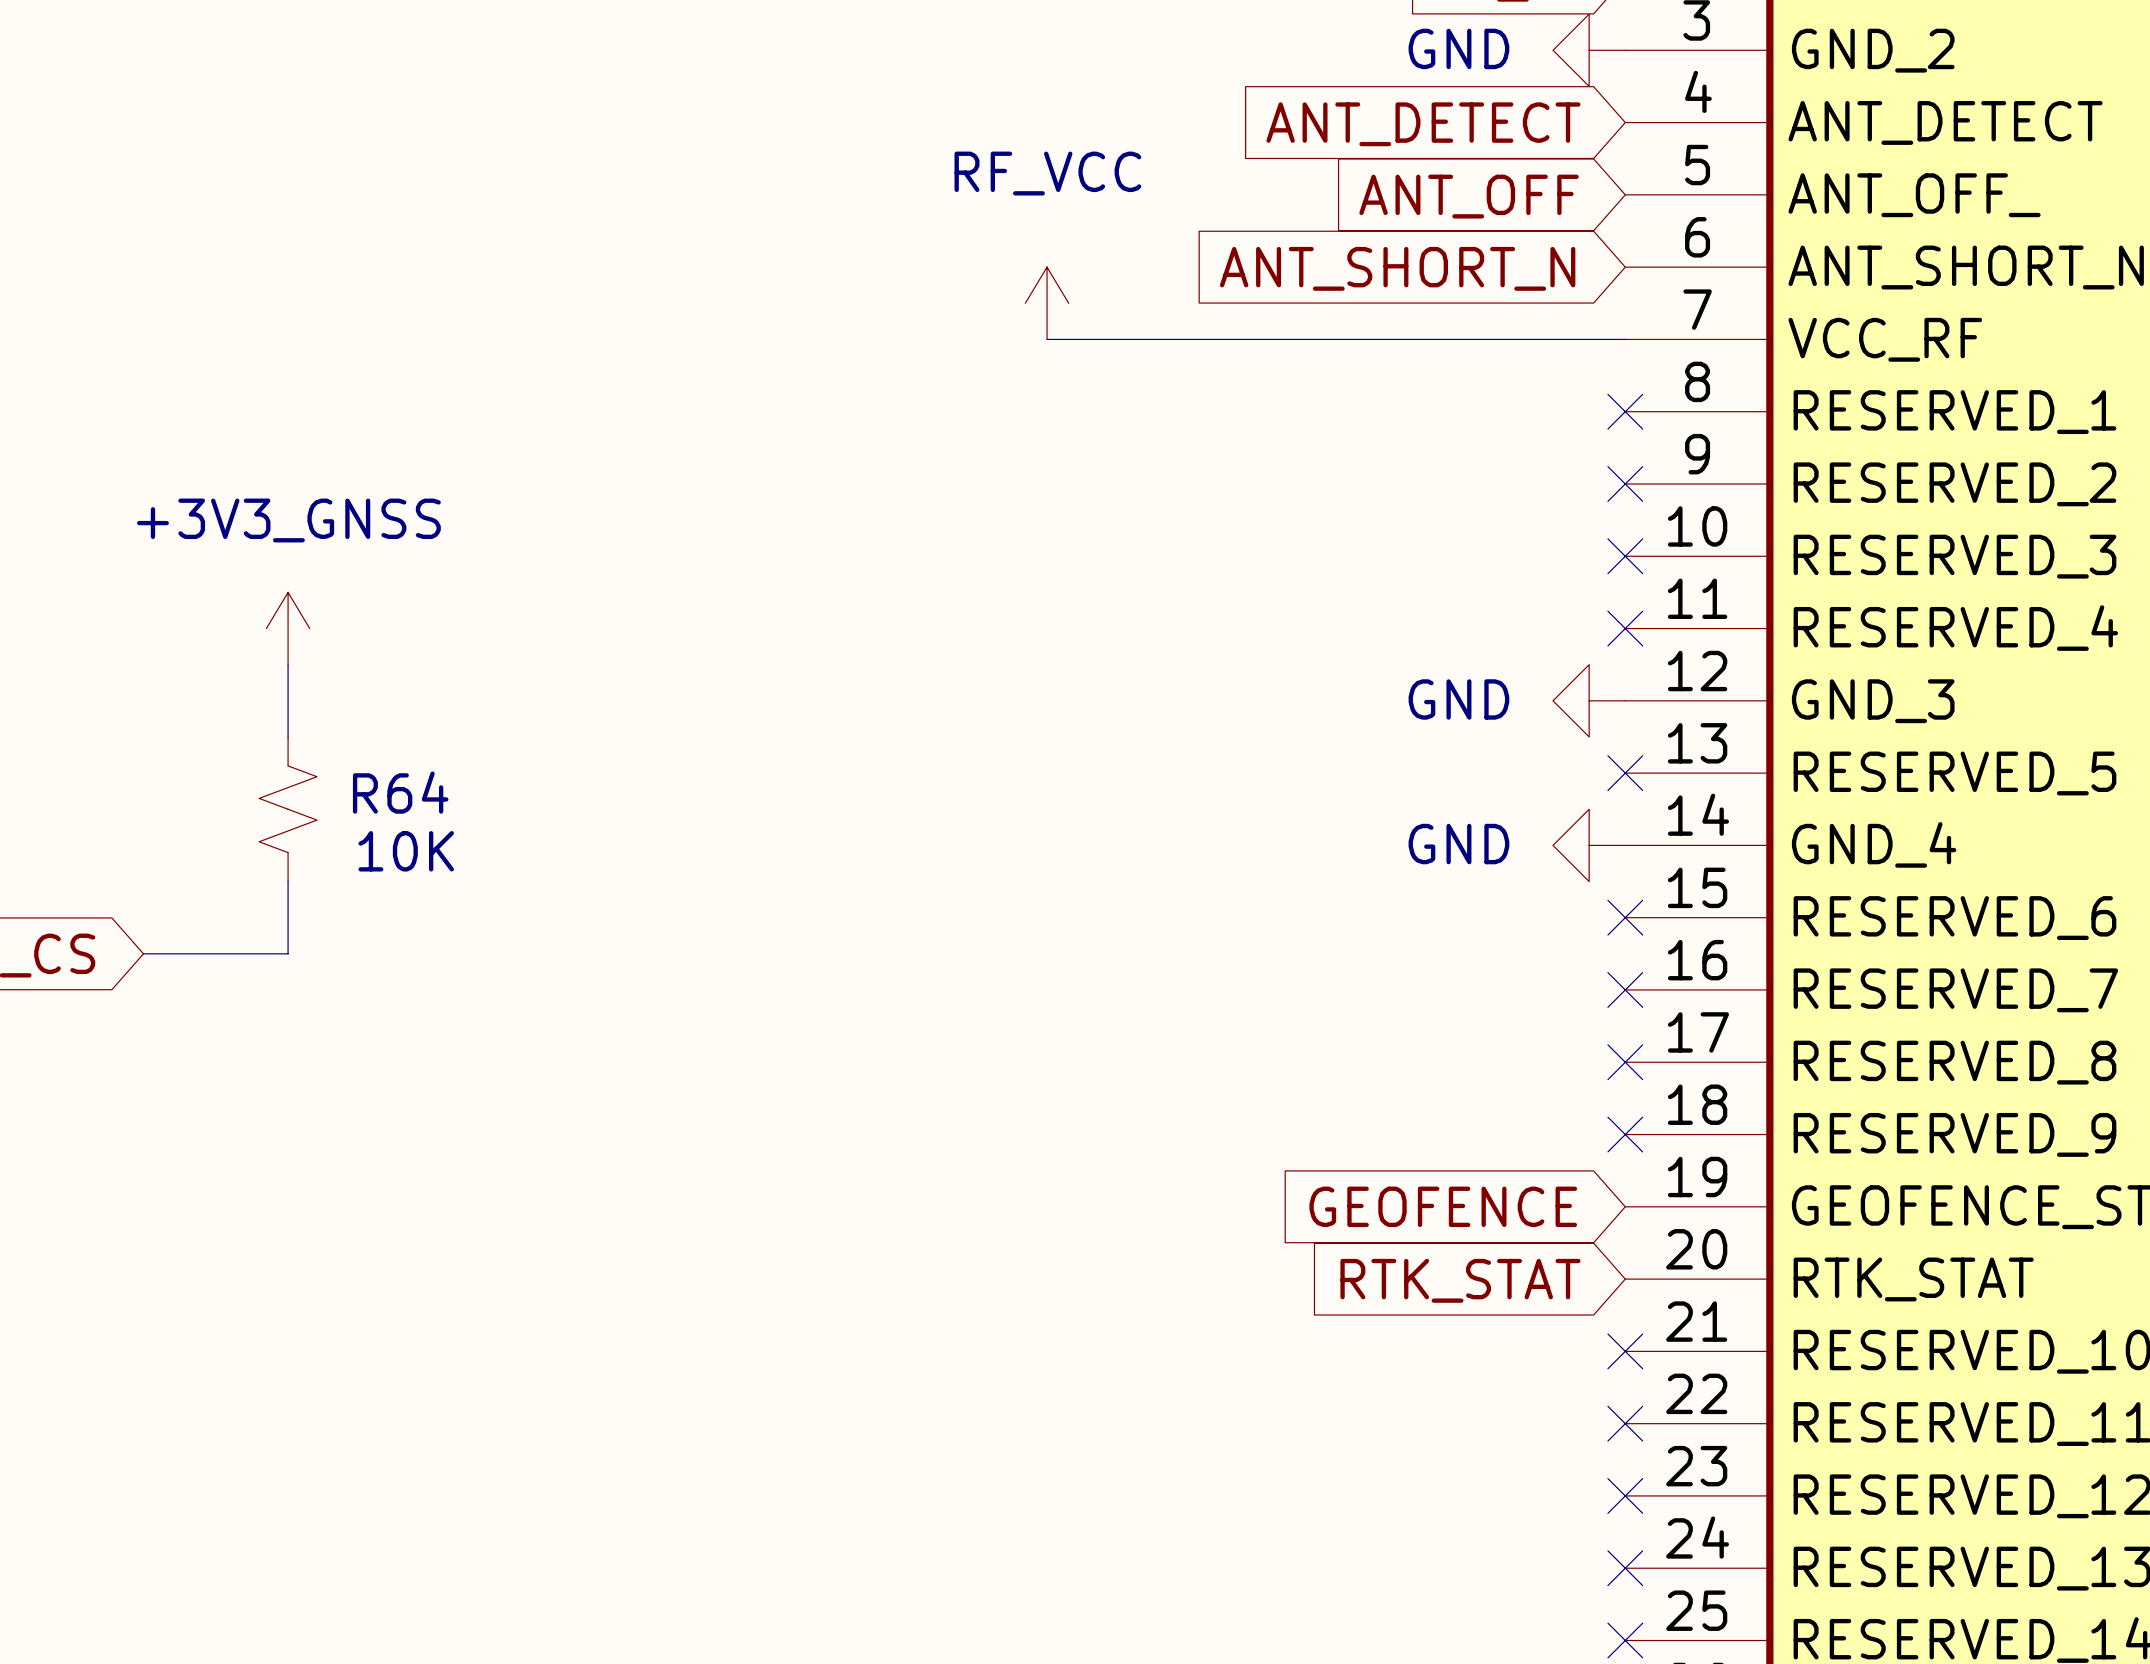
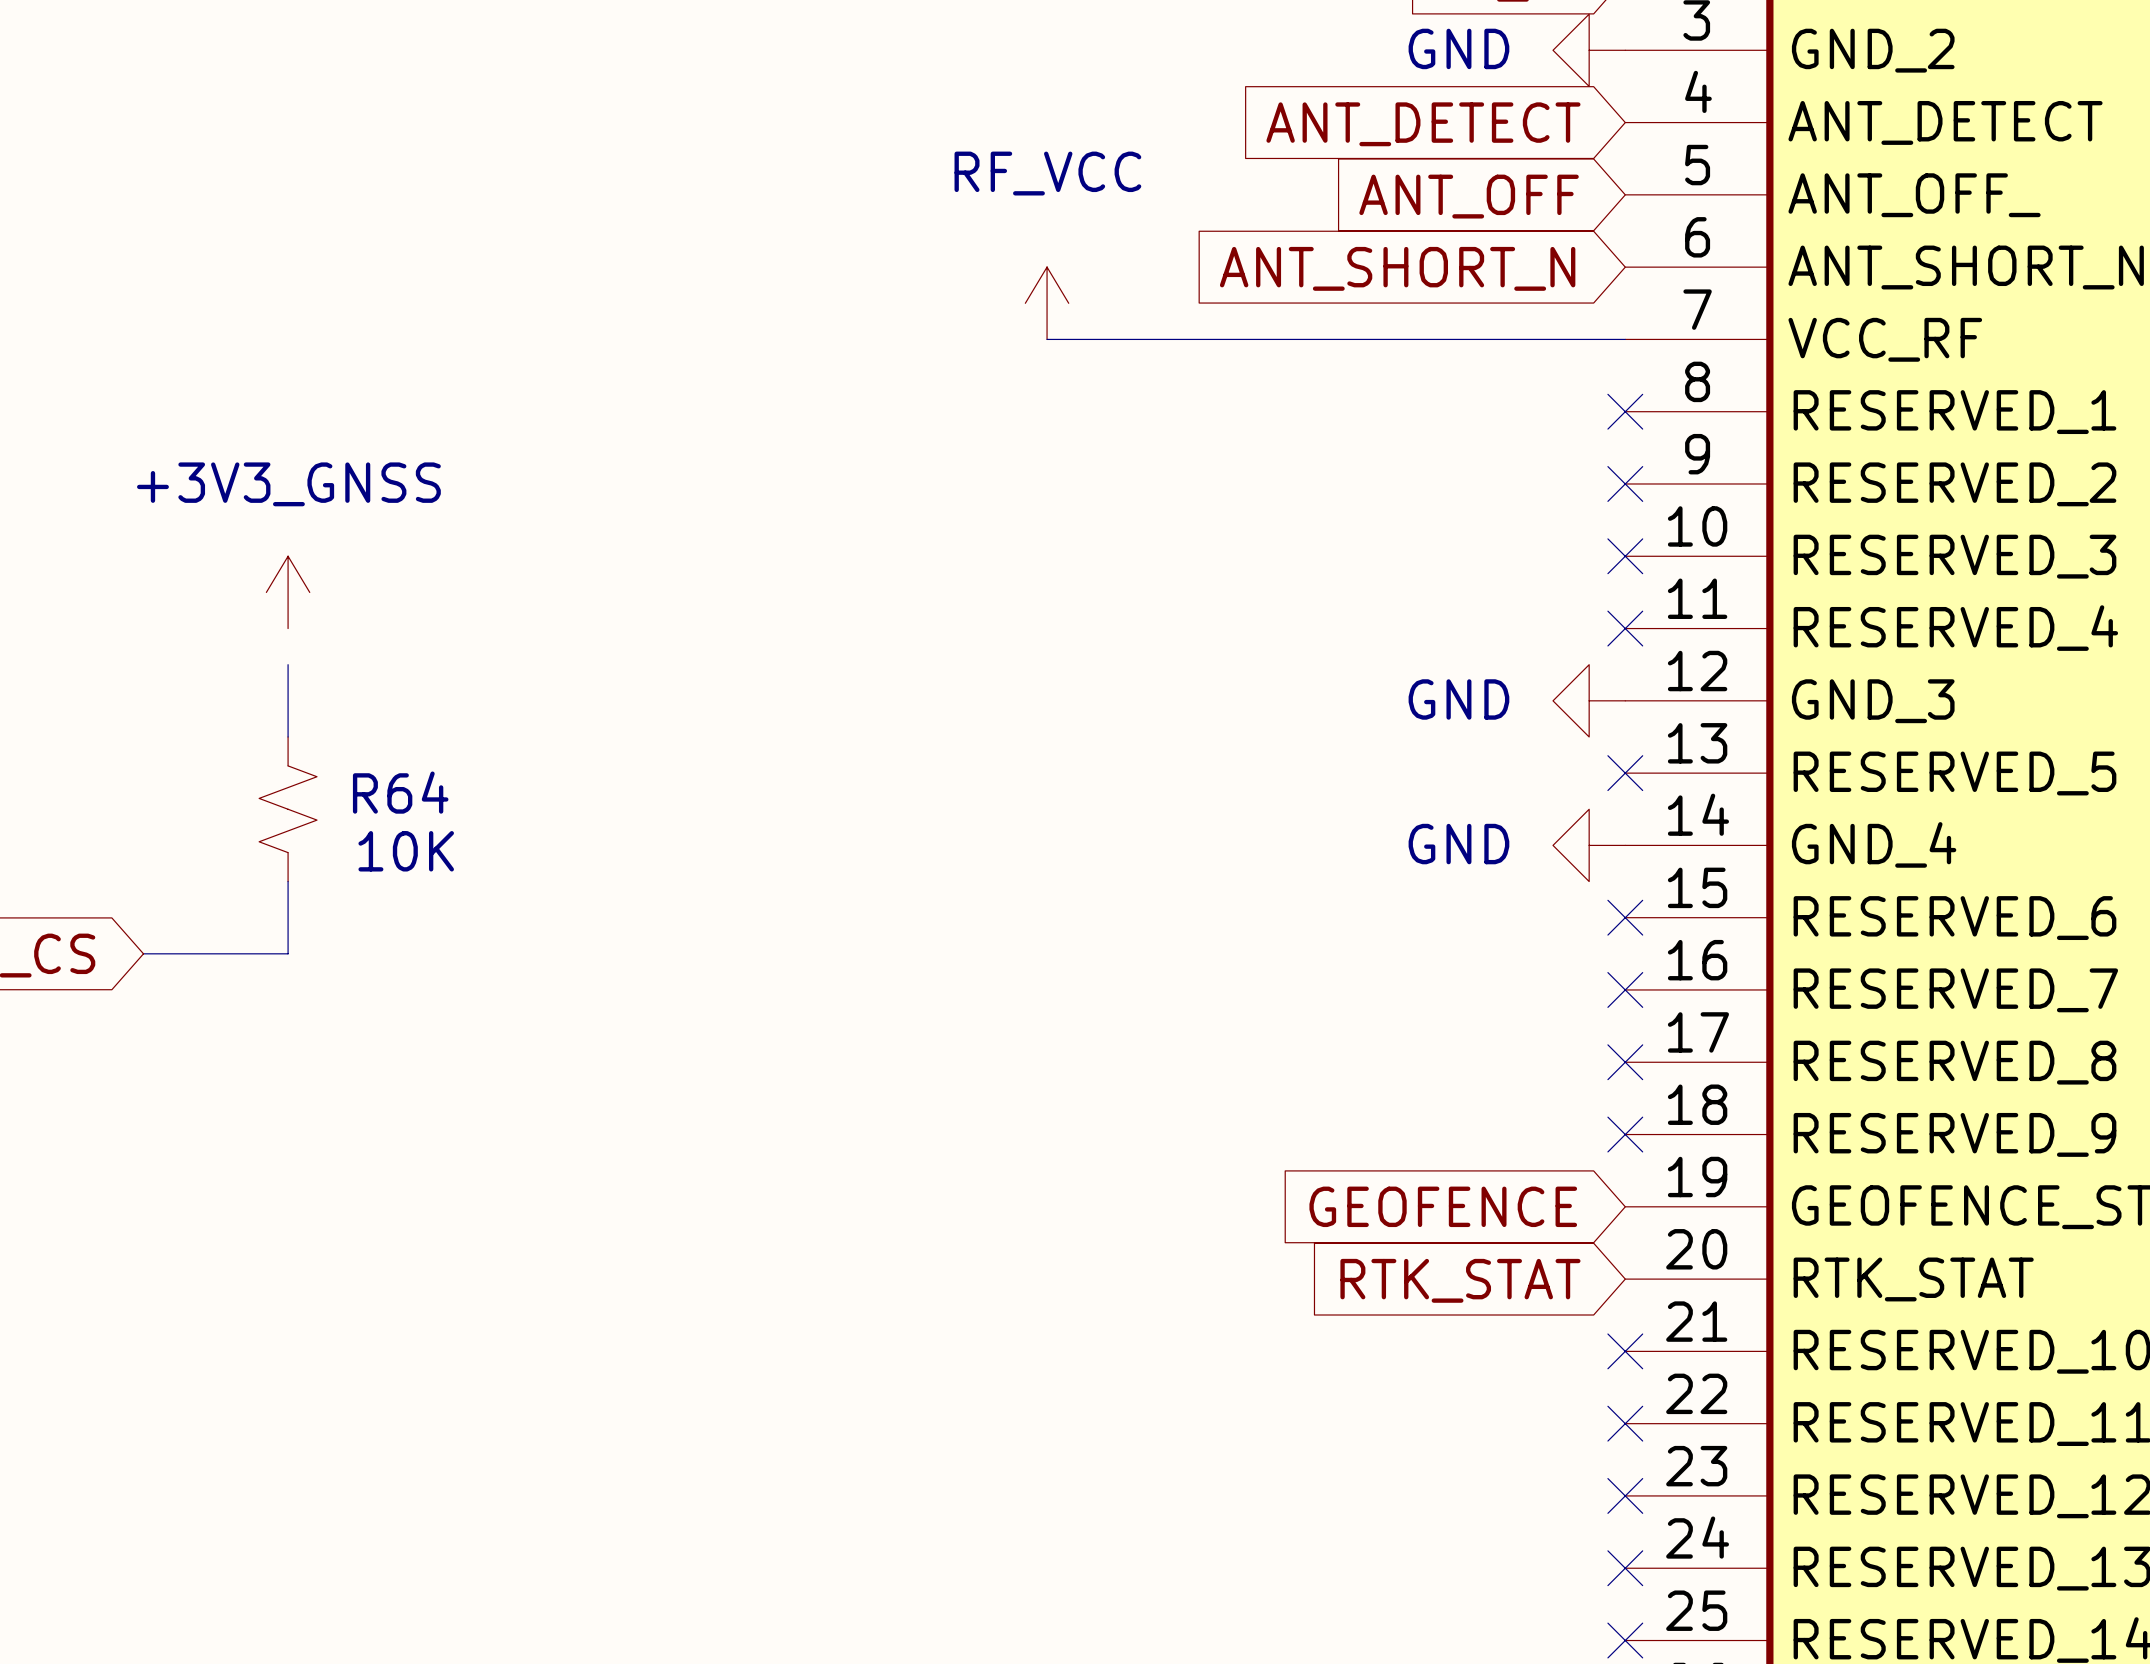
power symbol position: +3V3_GNSS (288, 628) -> +3V3_GNSS (288, 592)

